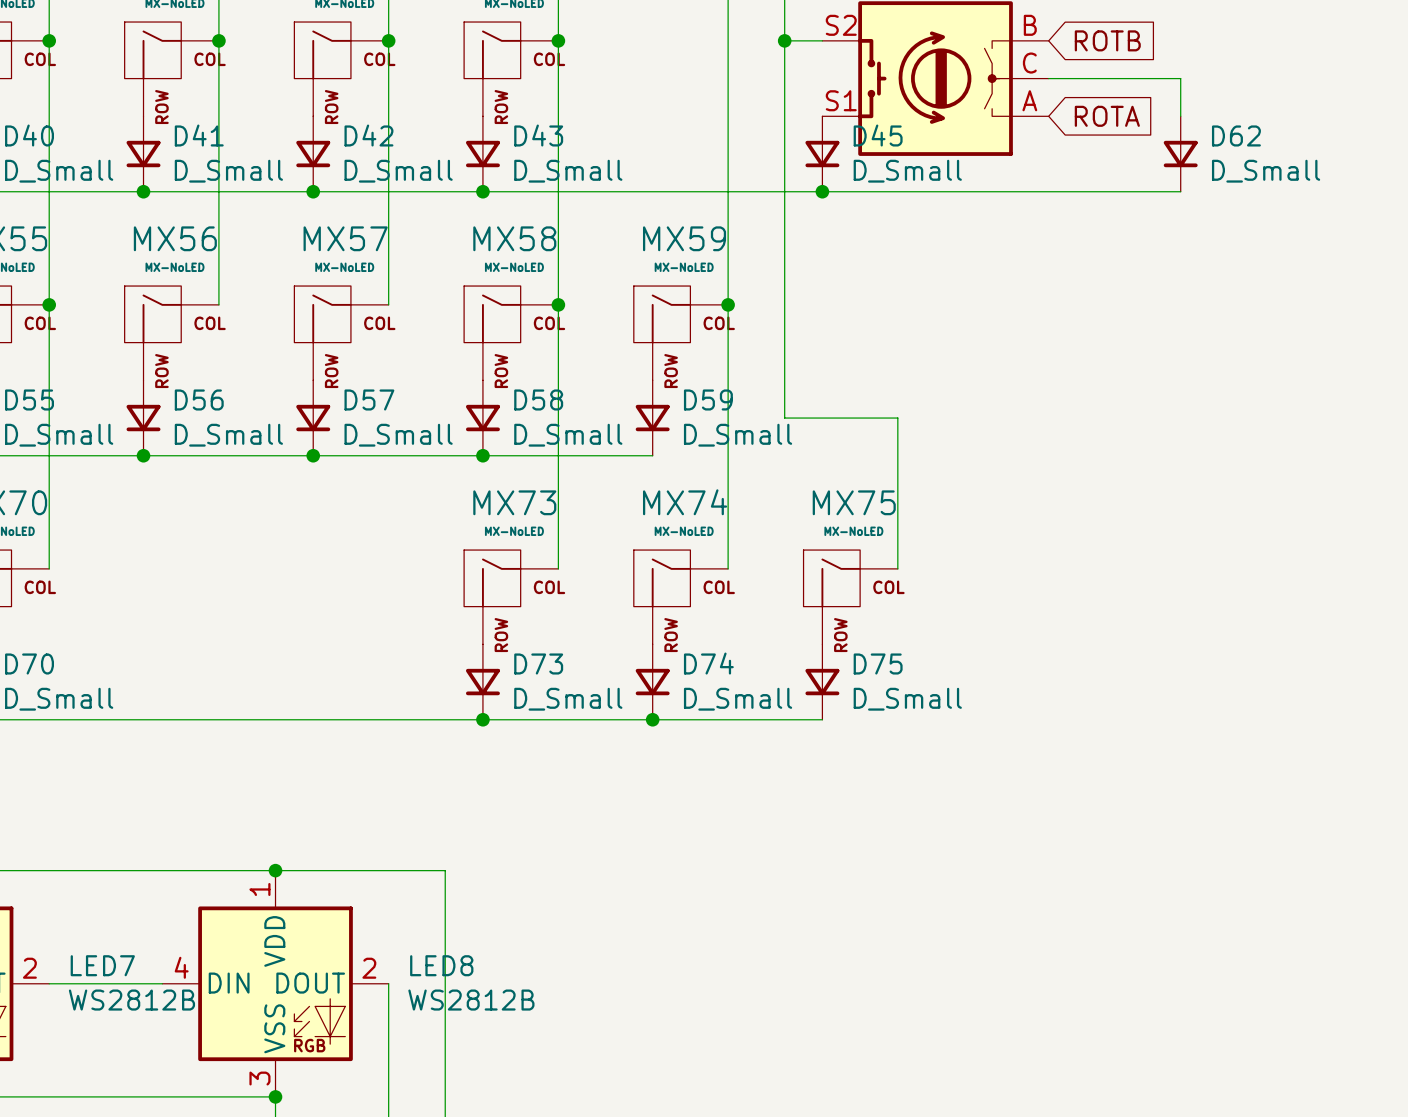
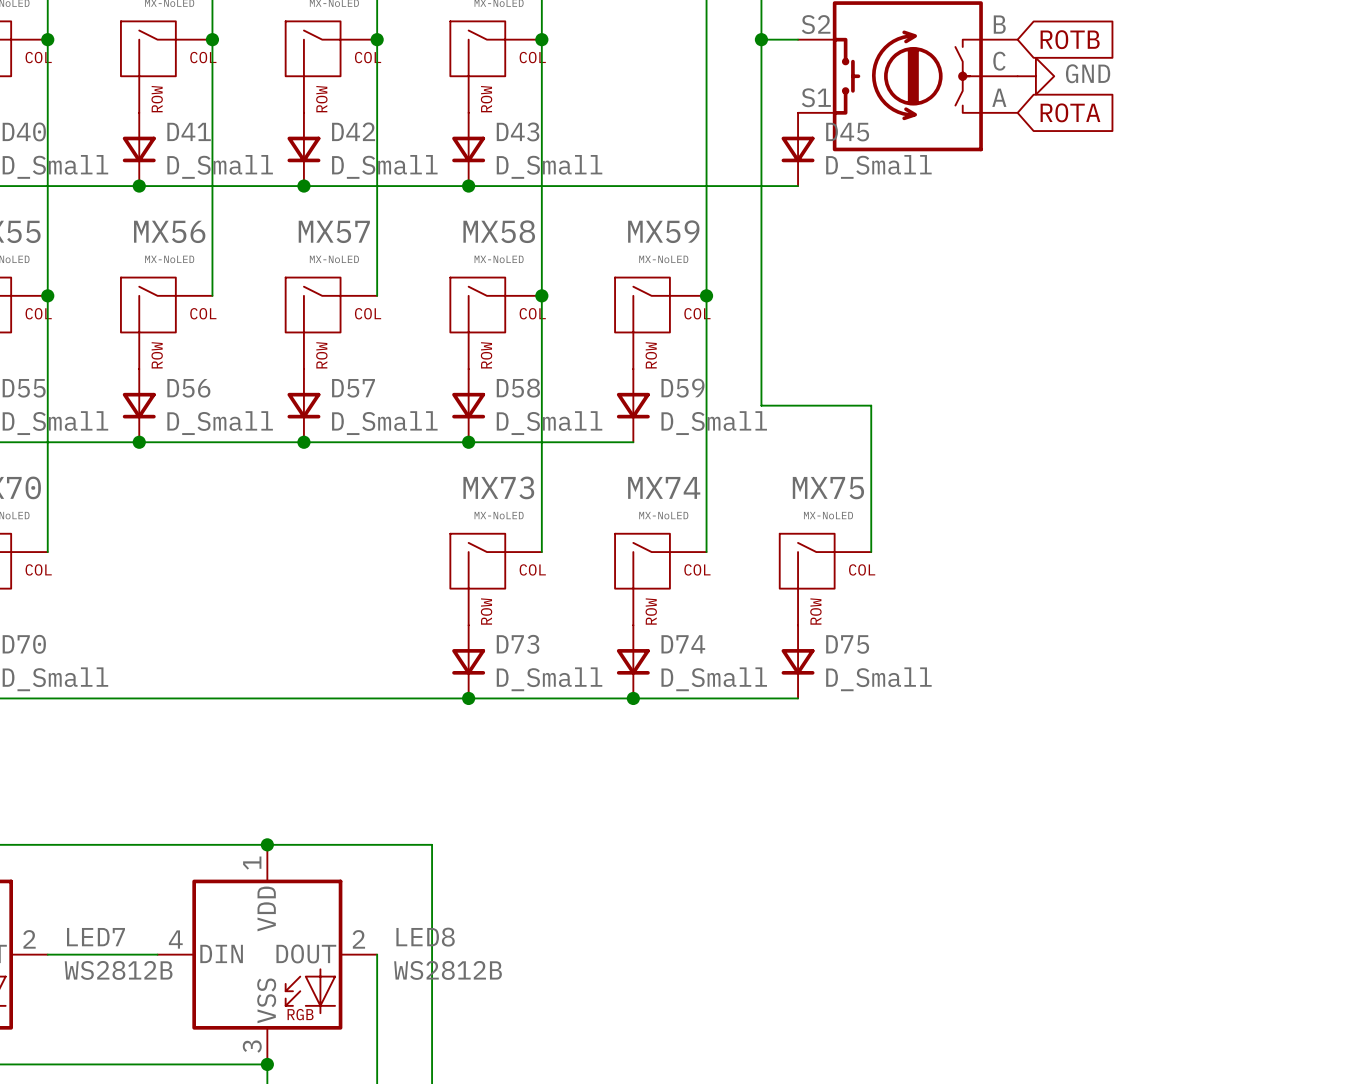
wire: (1048, 78) (1180, 78) (1180, 116) -> none
power symbol: none -> GND (1035, 76)
D62: D_Small (1180, 154) -> none
wire: (822, 191) (1180, 191) -> none
junction: (822, 191) -> none

